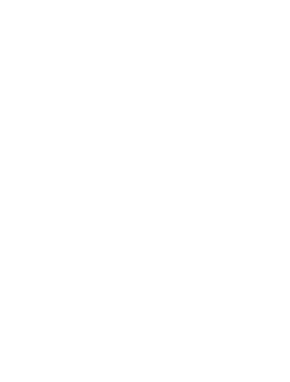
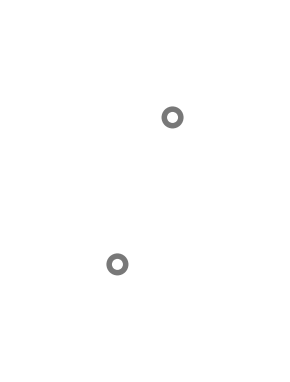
via: none -> (172, 117)
via: none -> (117, 264)

